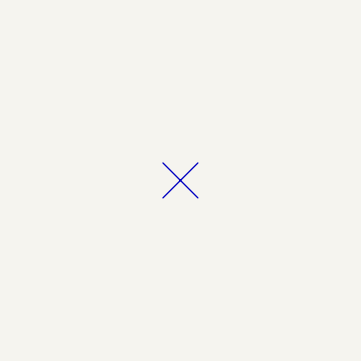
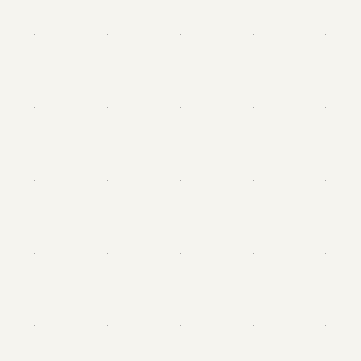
no-connect mark: (180, 180) -> none

